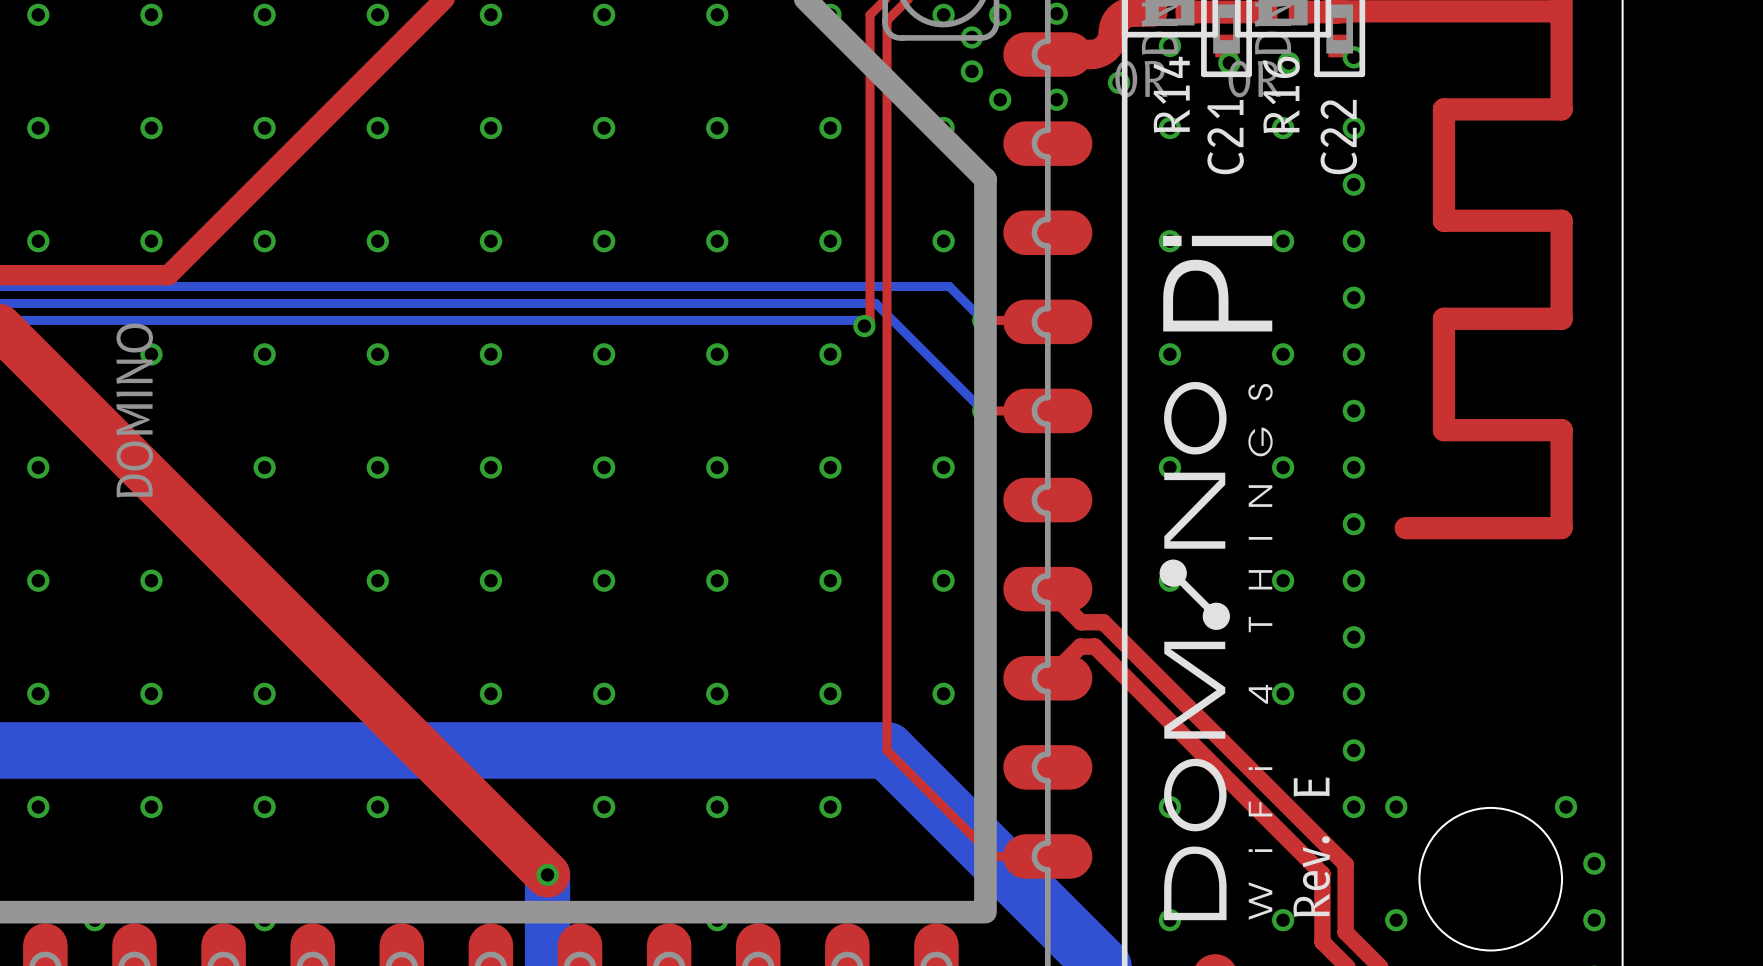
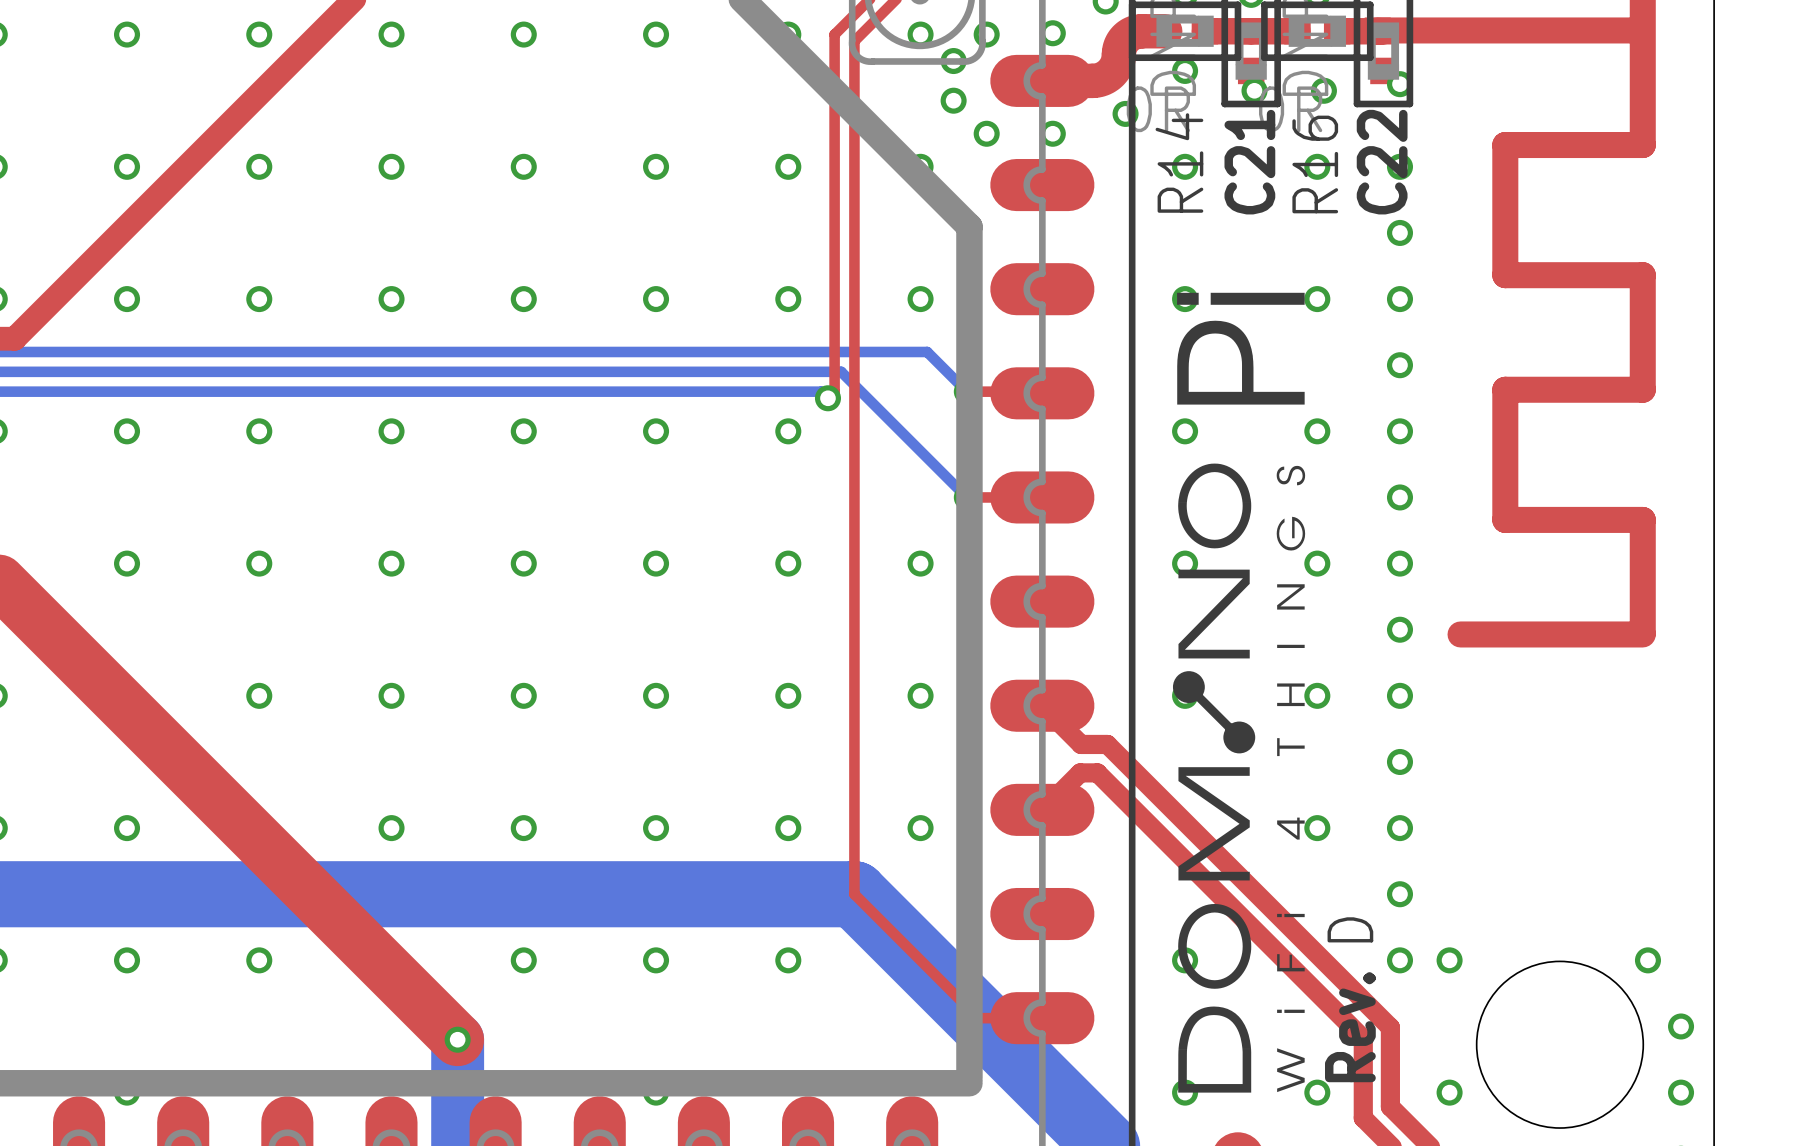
R14 name position: R14 (1171, 94) -> R14 (1179, 163)
R16 name position: R16 (1281, 94) -> R16 (1315, 164)
text: E (1311, 786) -> D (1350, 929)

